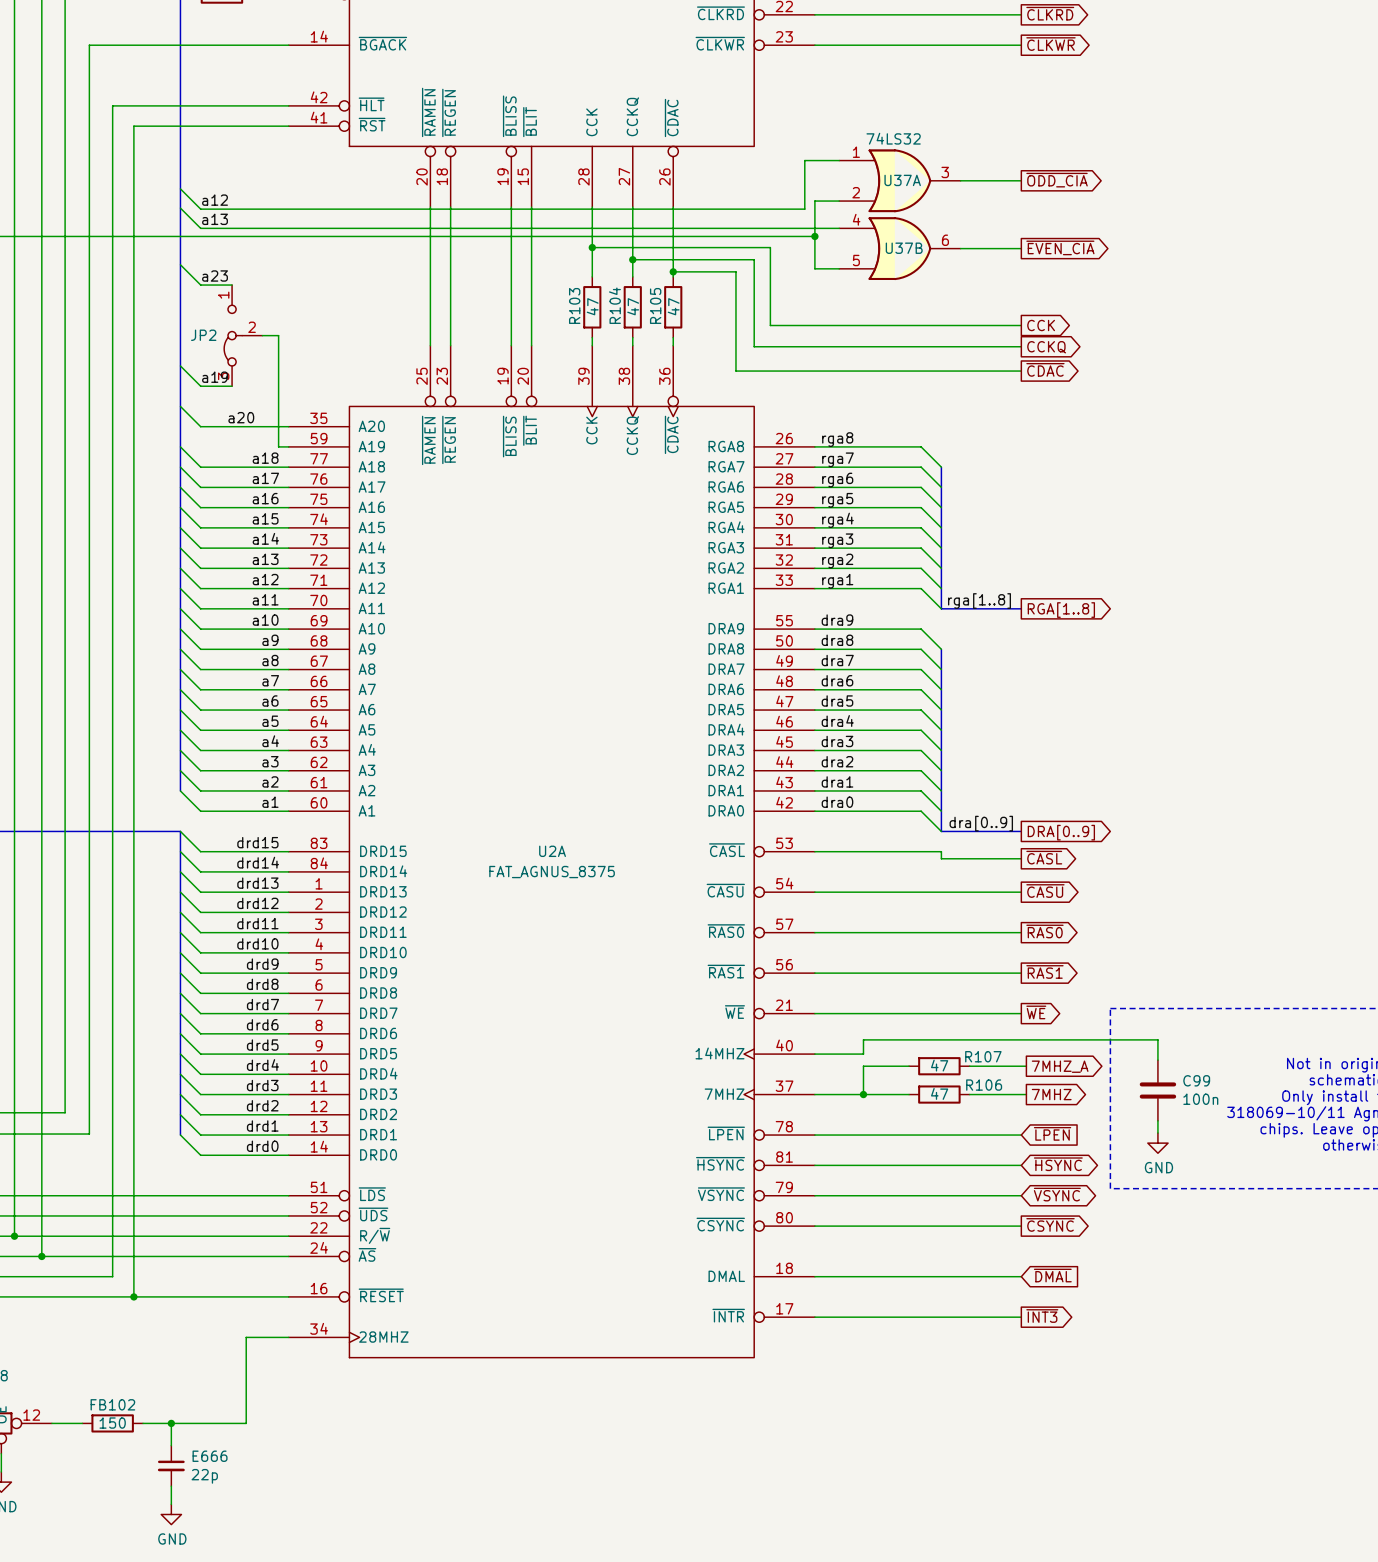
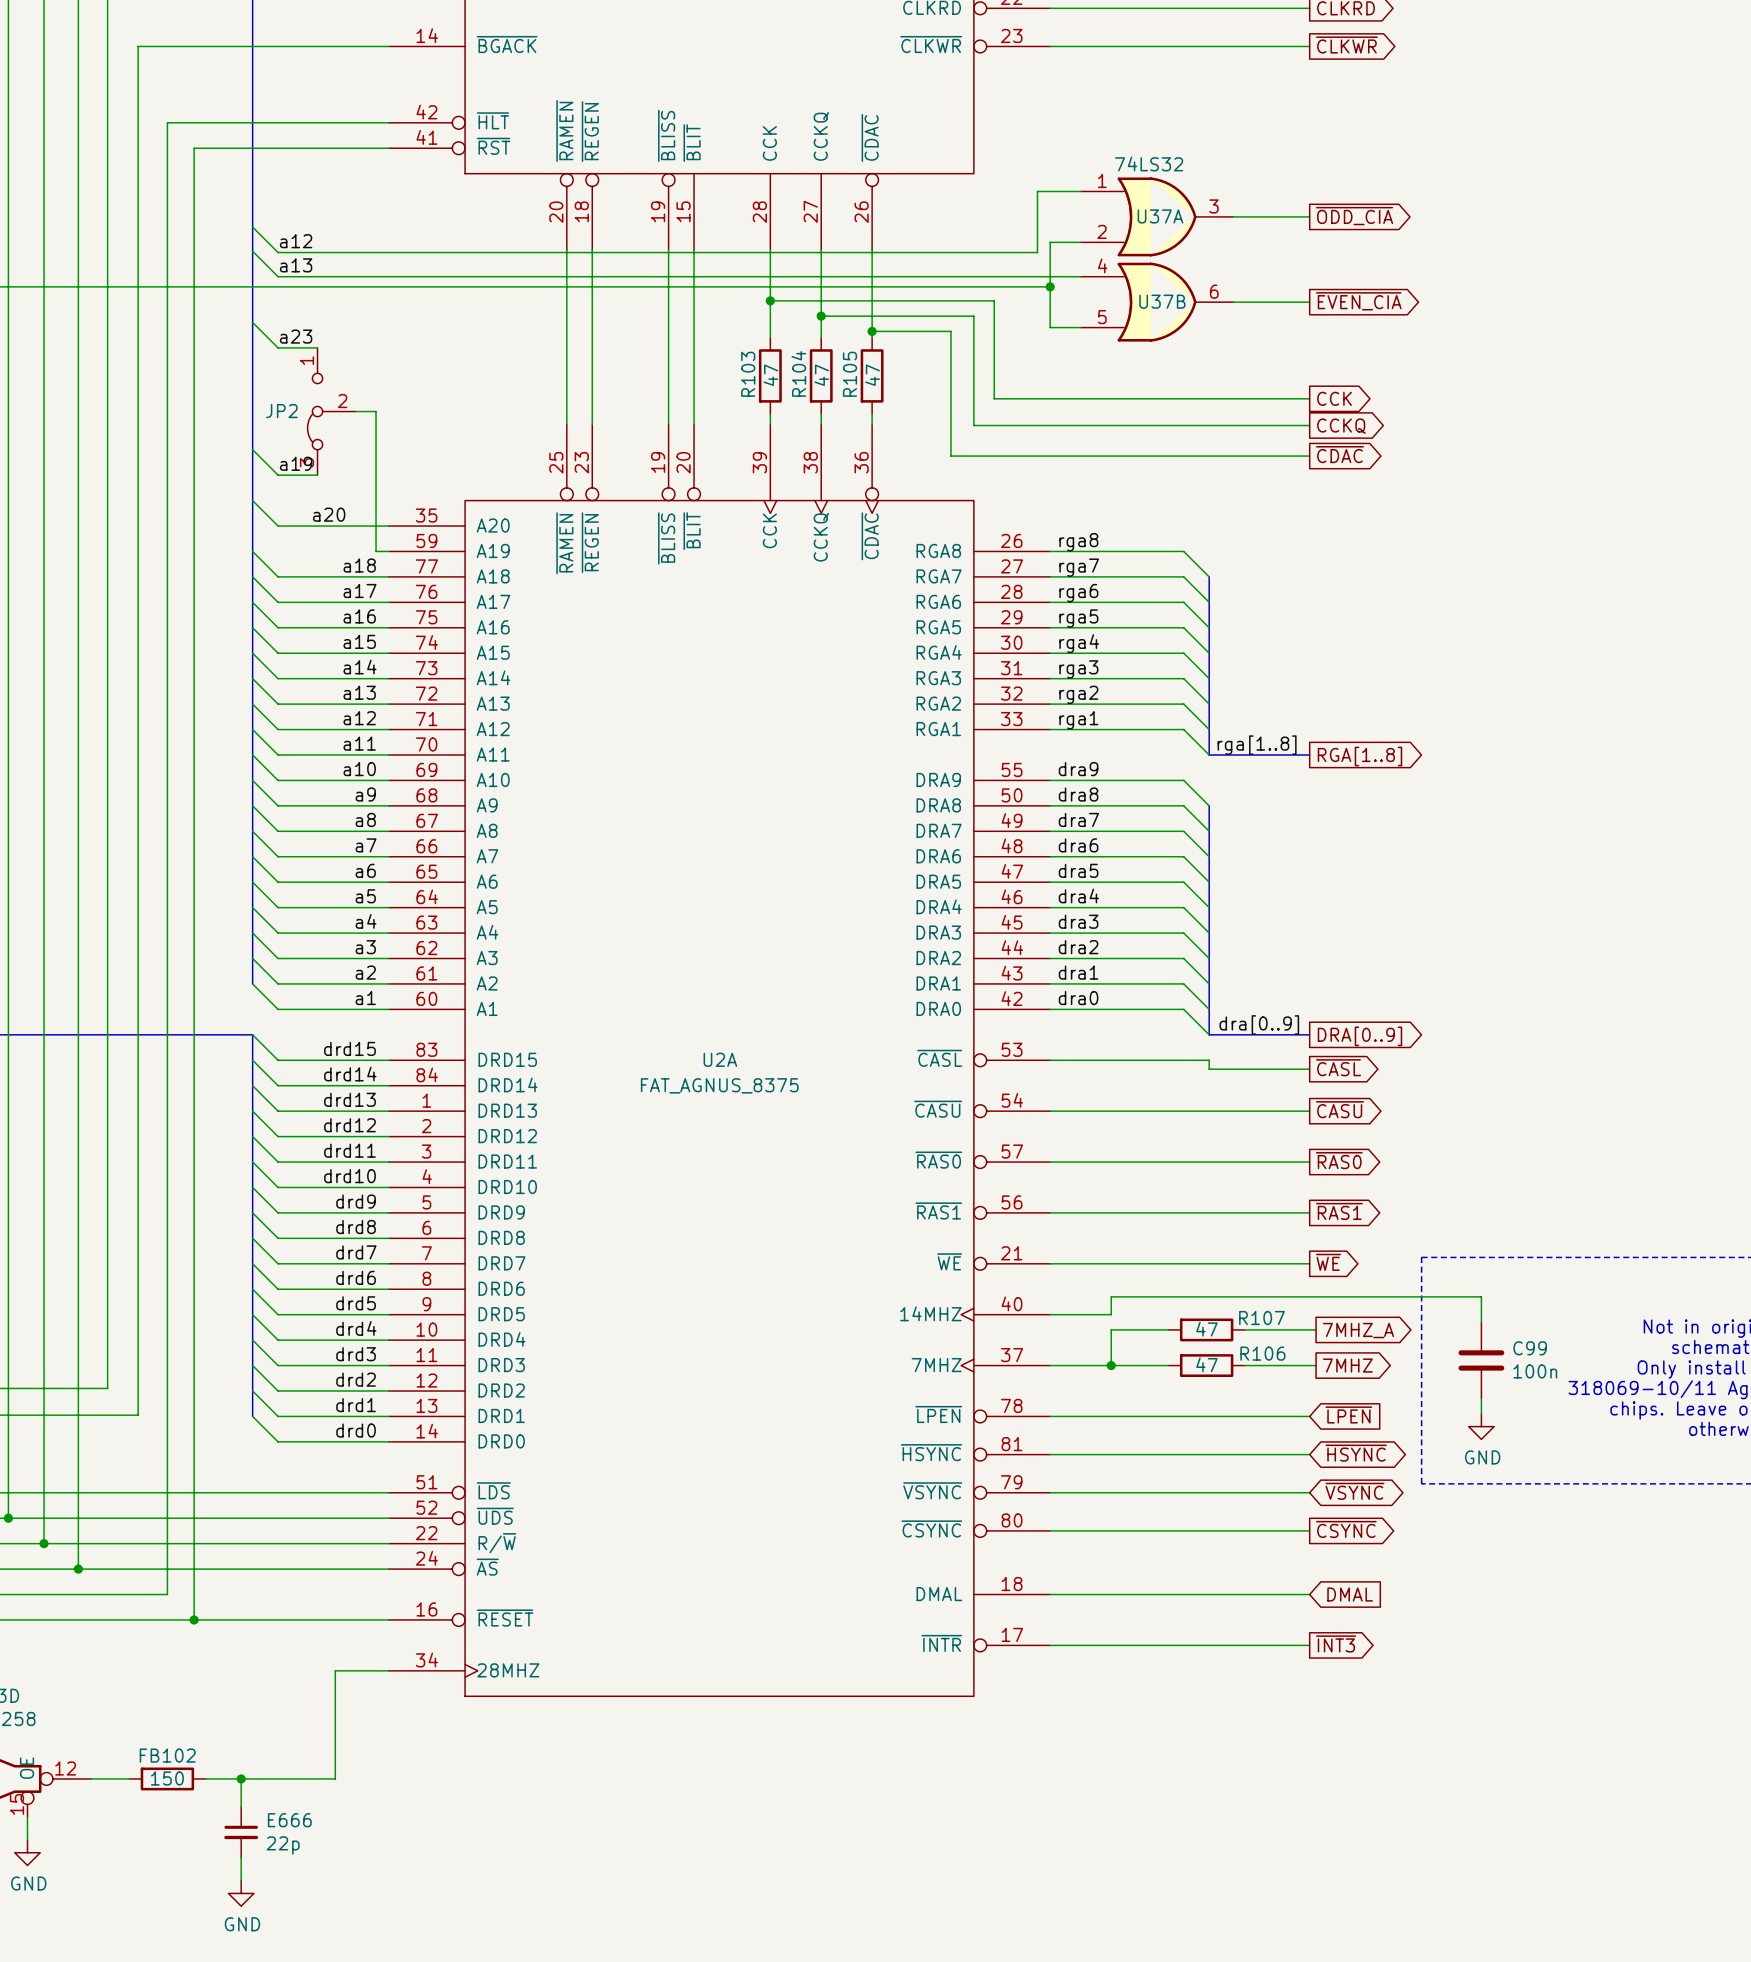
global label: ~{DMAL} (1052, 1275) -> DMAL (1350, 1594)

